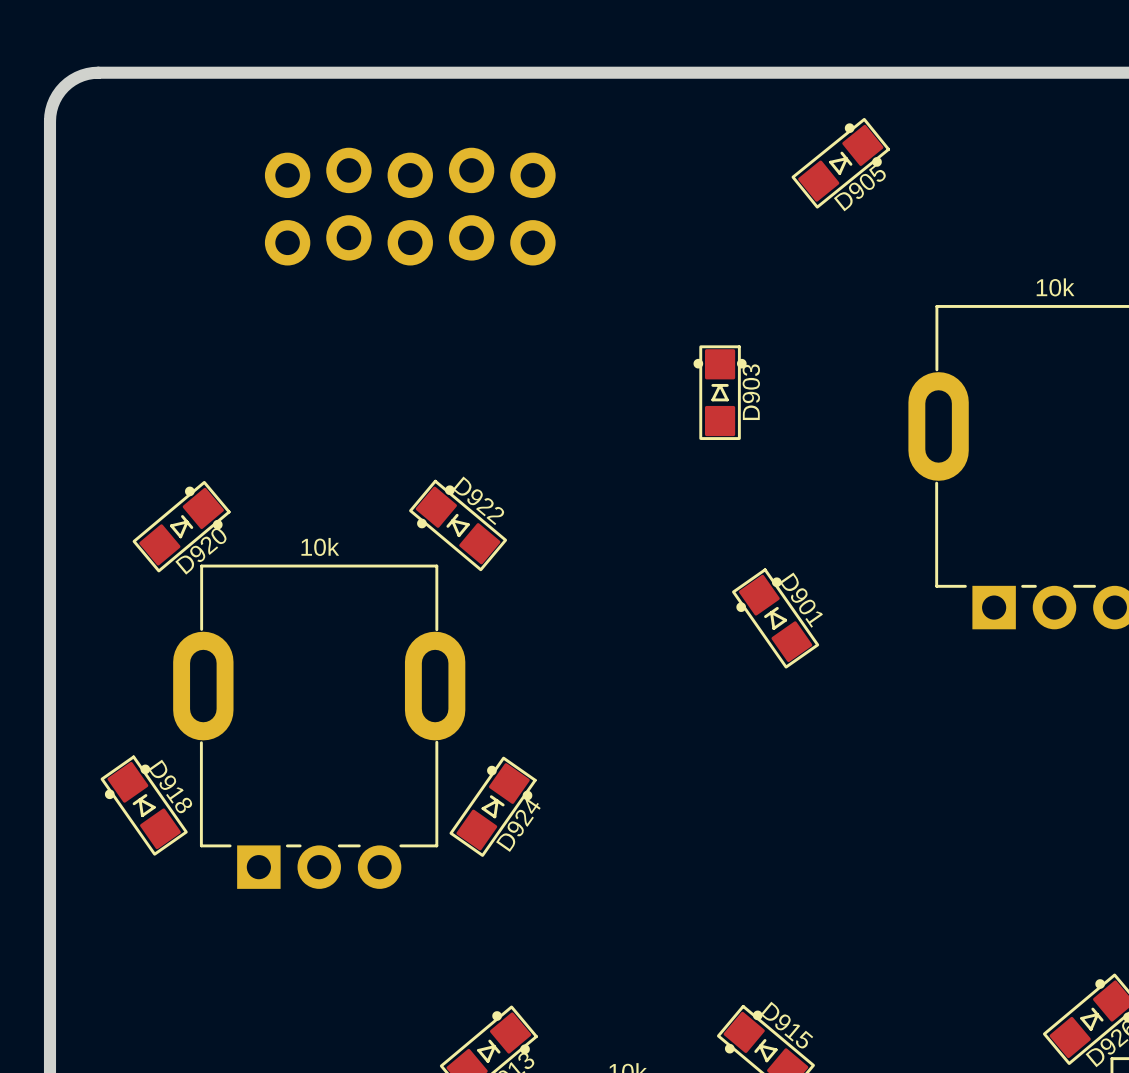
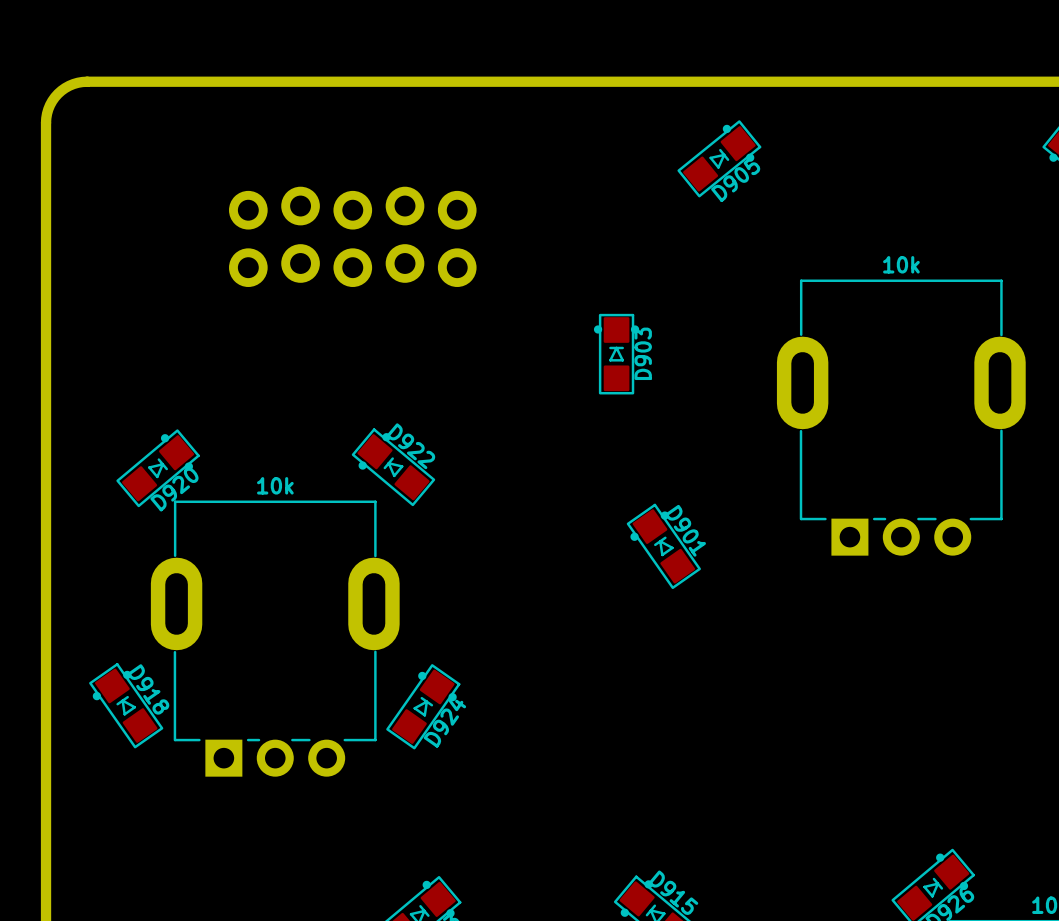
part position: (410, 206) -> (352, 236)

